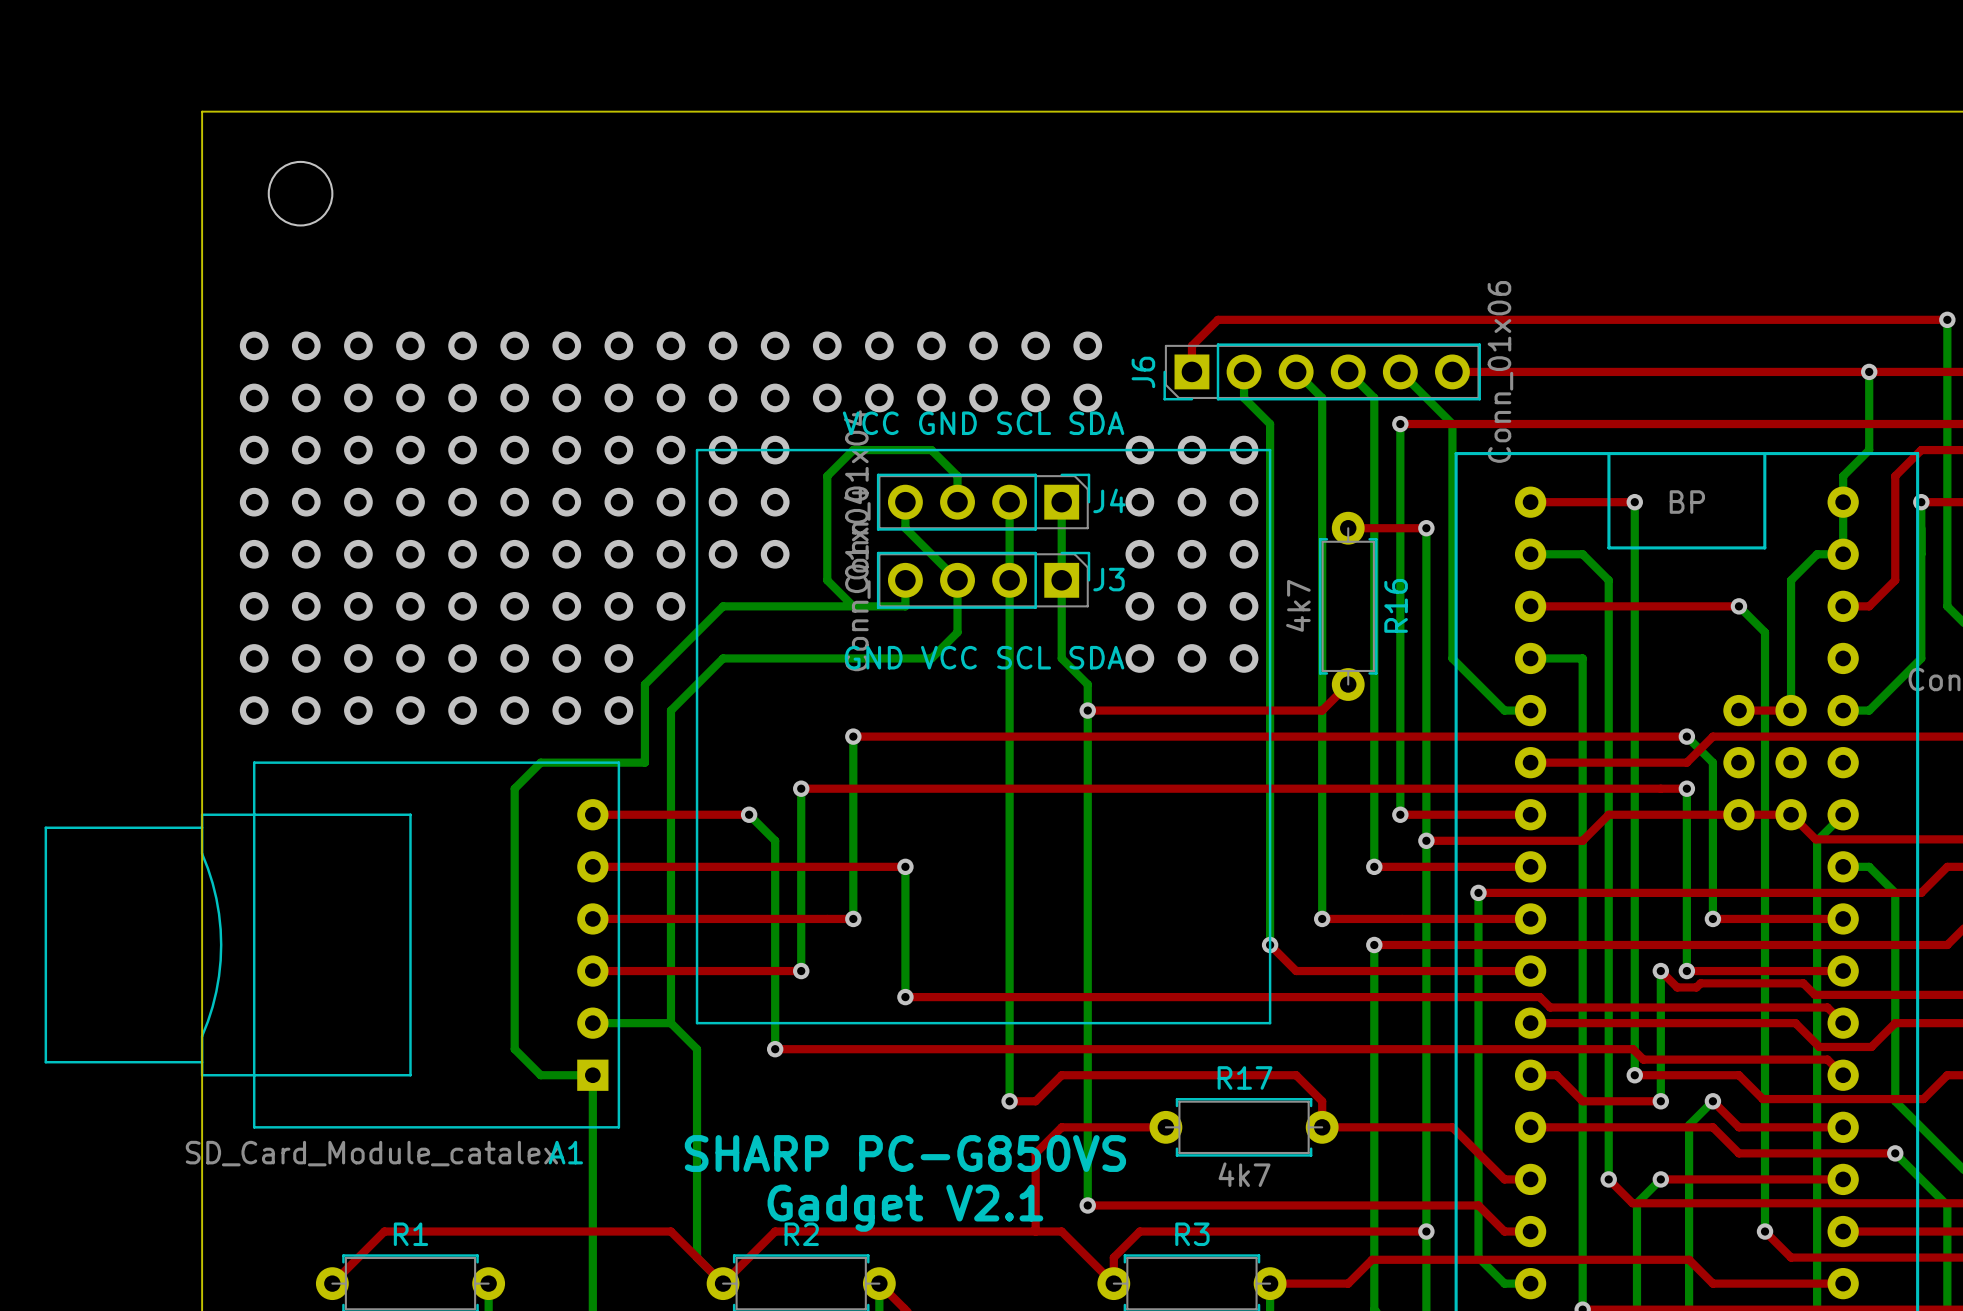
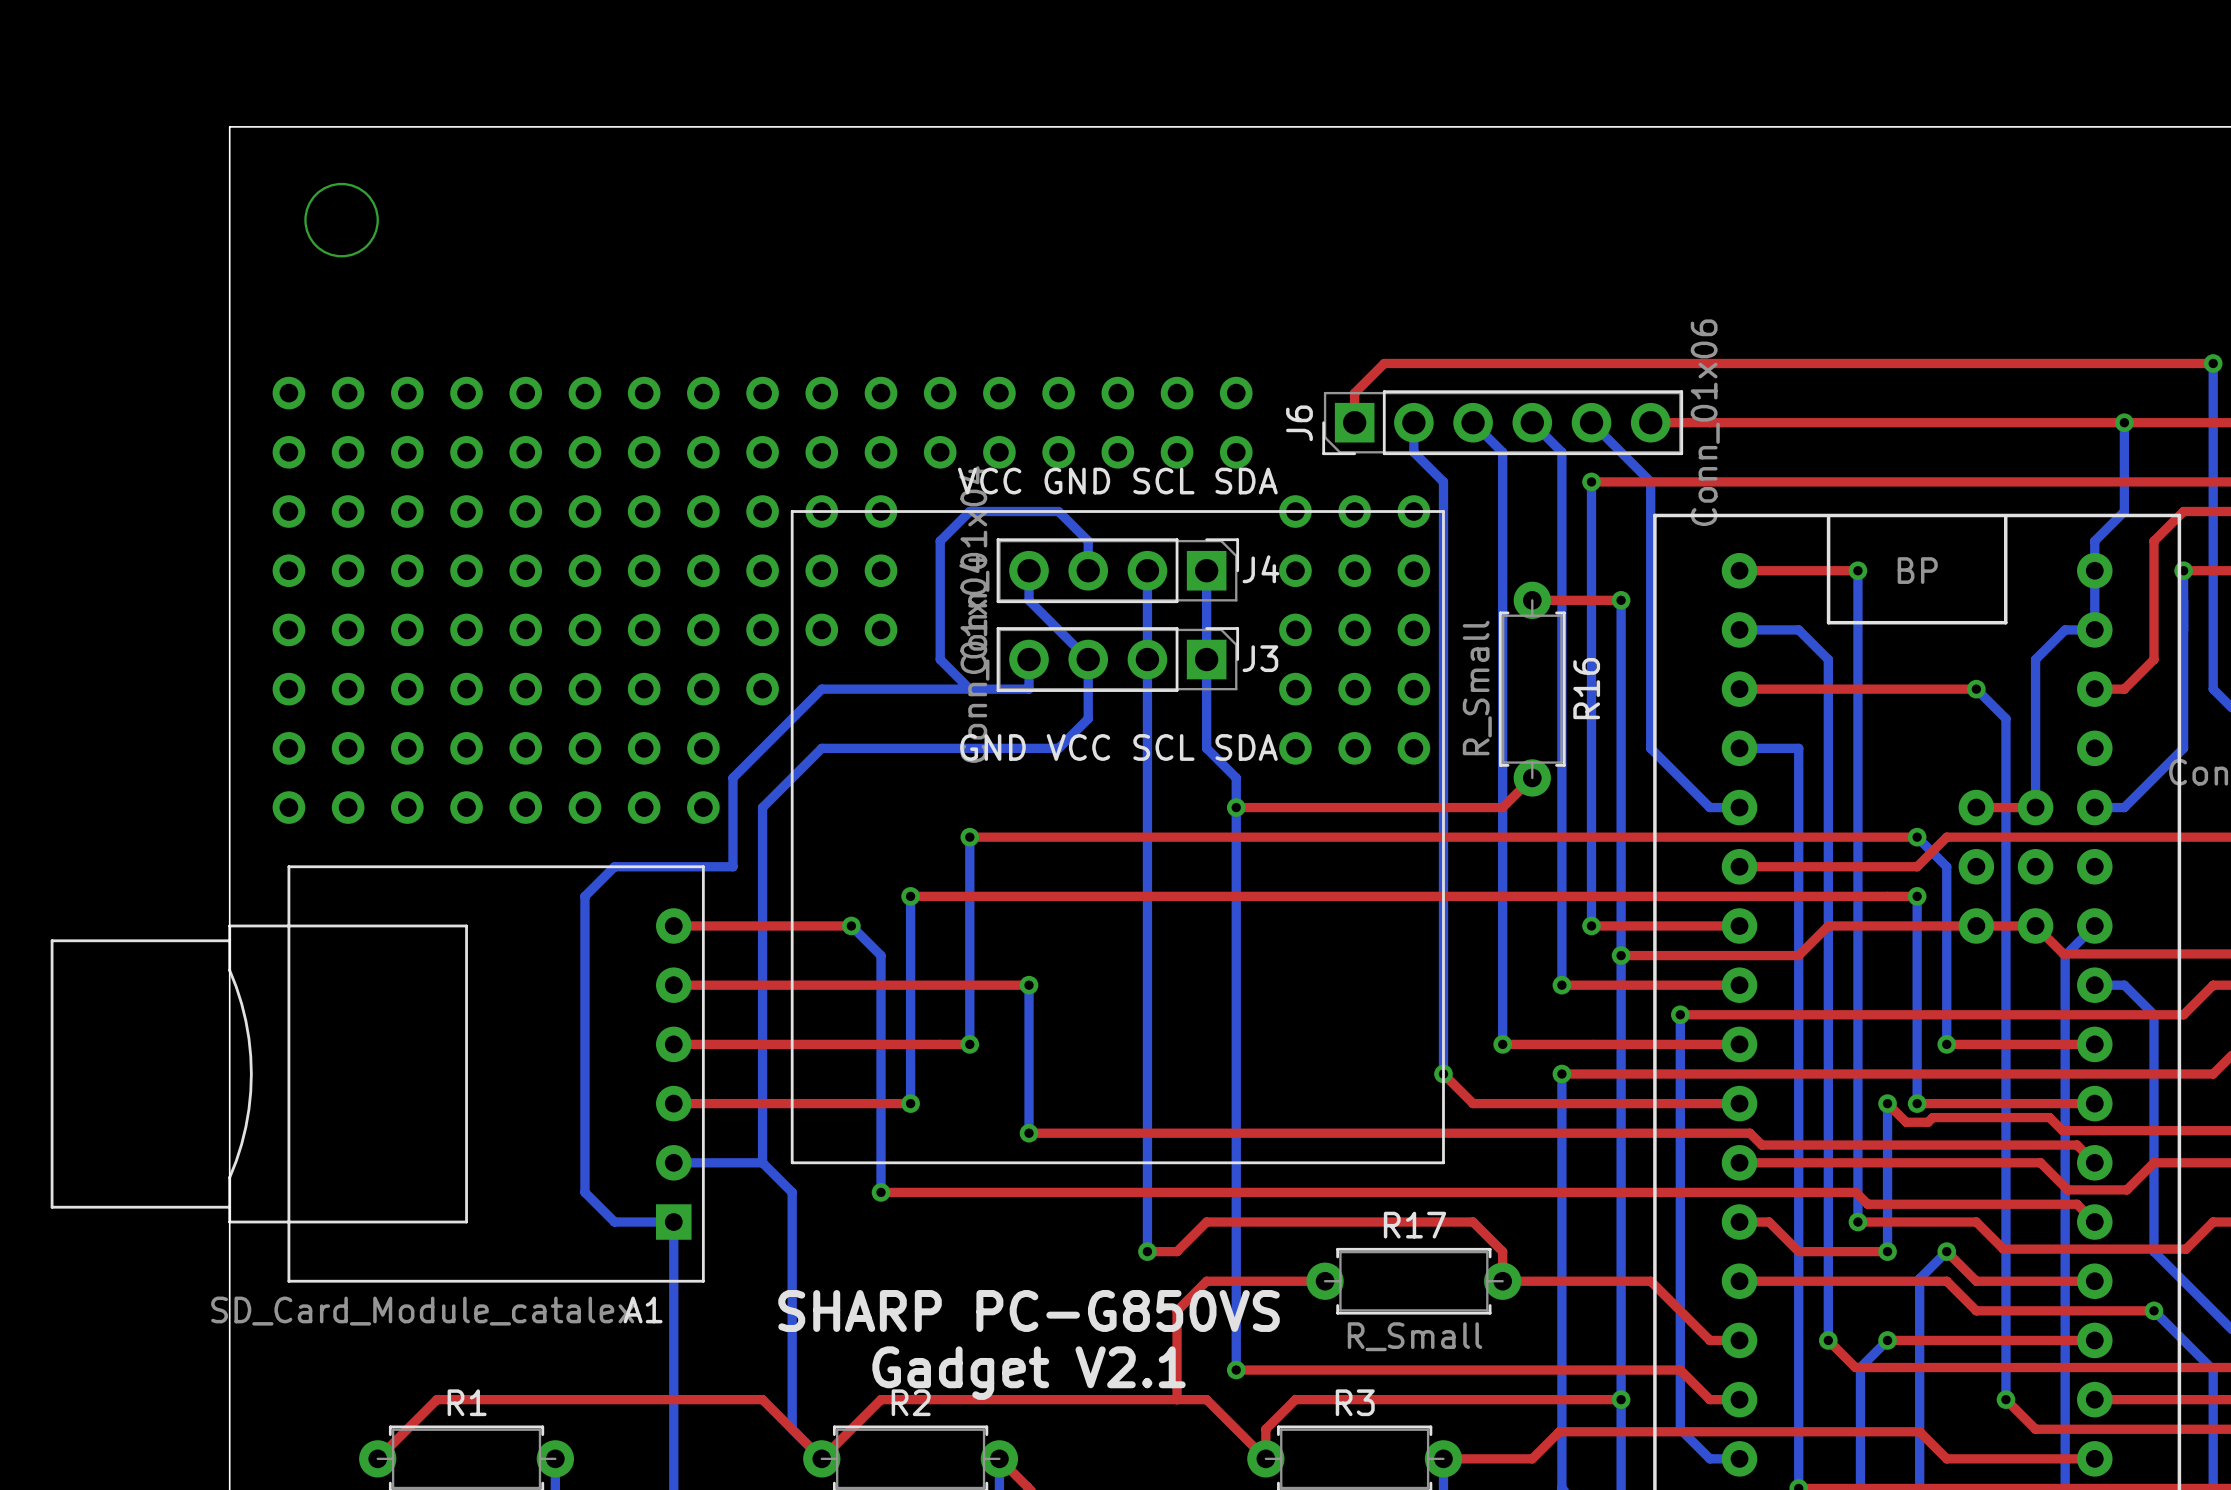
R16 value: 4k7 (1298, 605) -> R_Small (1477, 688)
R17 value: 4k7 (1244, 1174) -> R_Small (1414, 1336)

